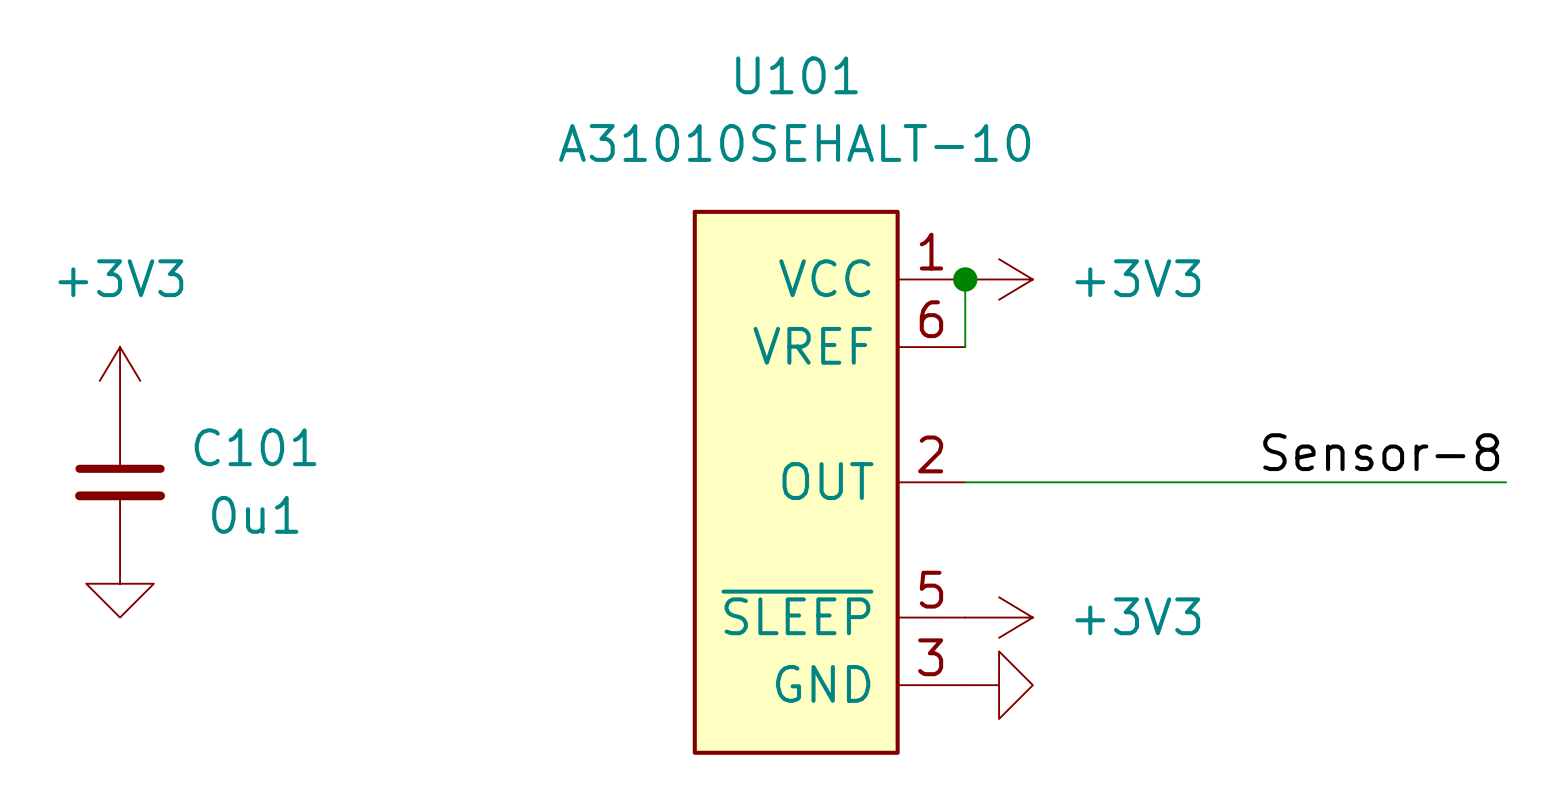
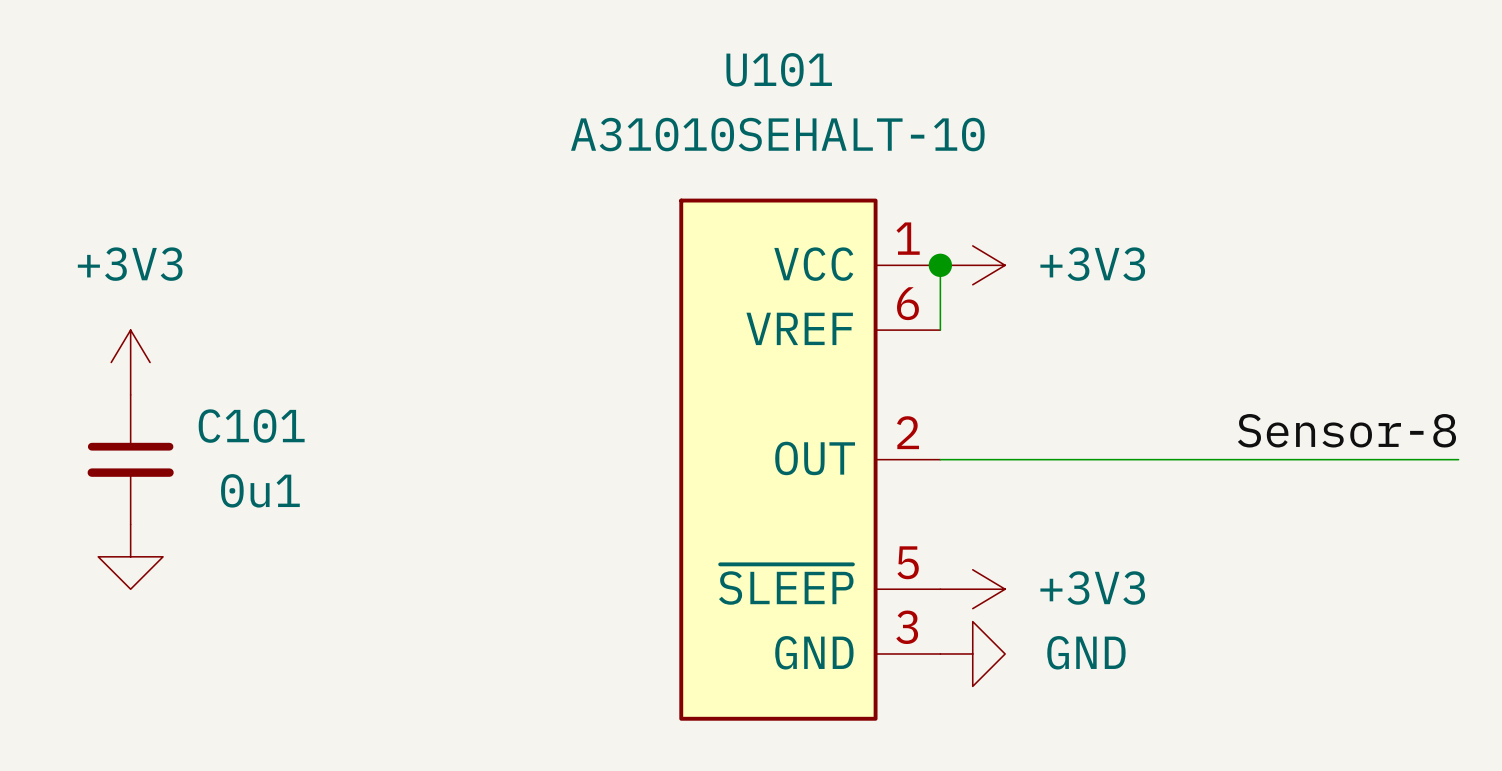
power symbol text: none -> GND (1086, 652)

